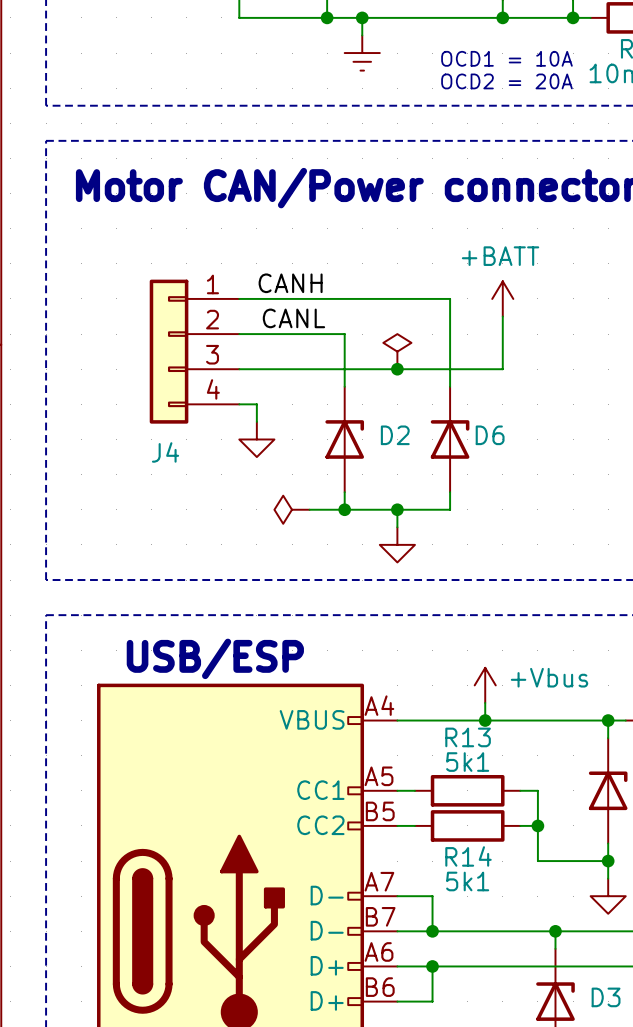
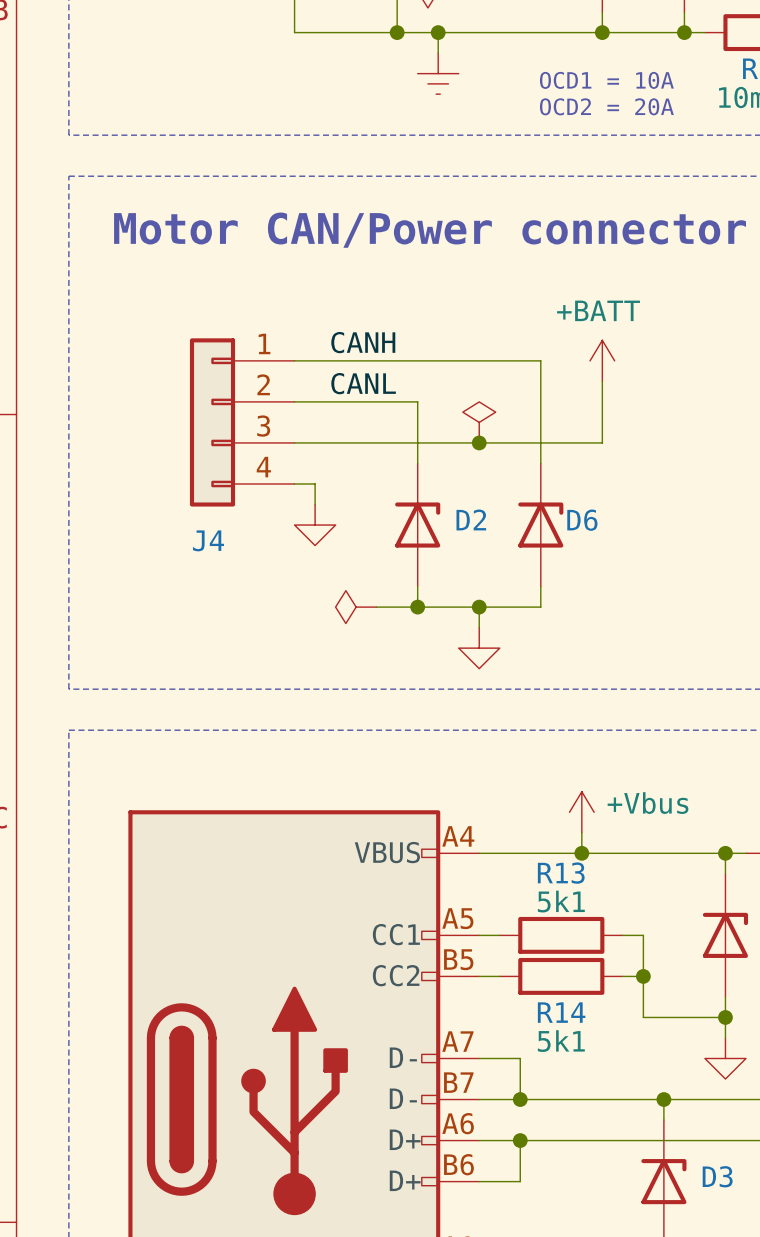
text: USB/ESP (215, 658) -> none

